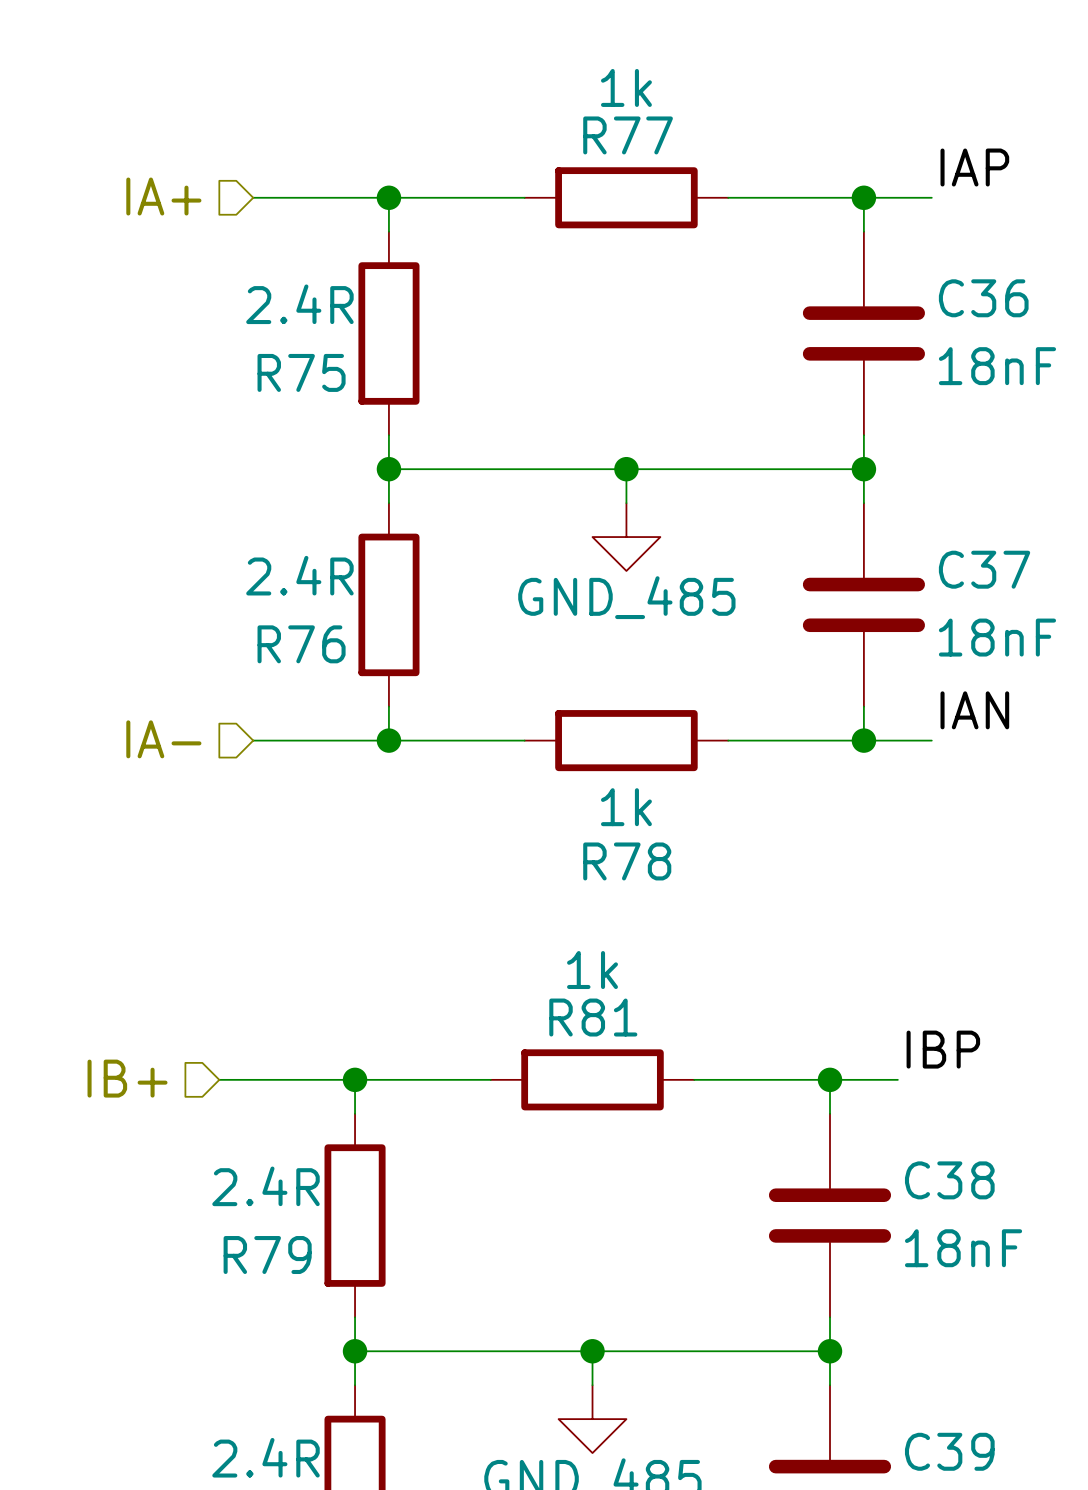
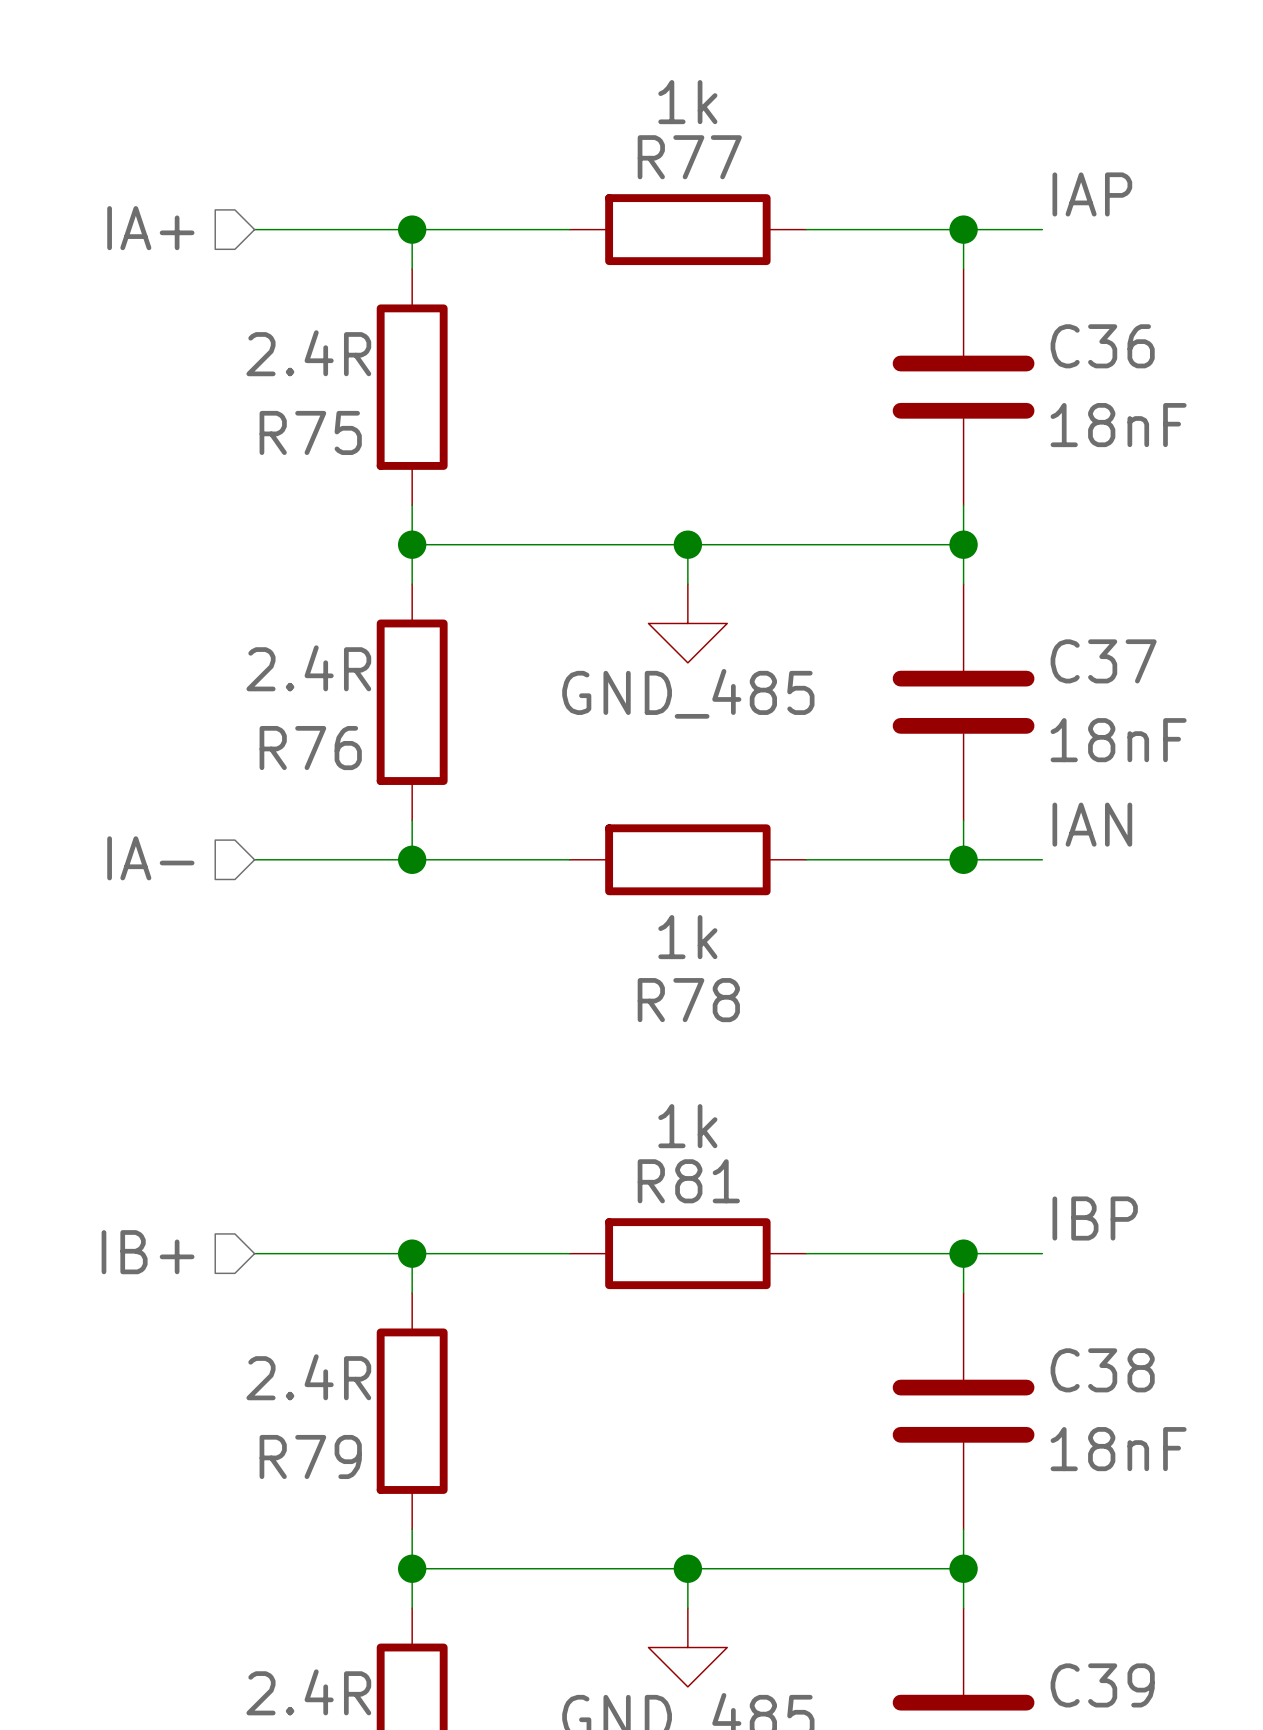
label position: IAP (974, 167) -> IAP (1092, 194)
hierarchical label position: IA+ (163, 196) -> IA+ (150, 228)
wire: none -> (254, 229) (294, 229)
wire: (388, 197) (388, 231) -> (412, 229) (412, 269)
junction position: (388, 197) -> (412, 229)
R77 position: (626, 197) -> (687, 229)
wire: (863, 197) (863, 231) -> (963, 229) (963, 269)
junction position: (863, 197) -> (963, 229)
wire: (897, 197) (931, 197) -> none
R75 position: (388, 333) -> (412, 387)
C36 position: (863, 333) -> (963, 387)
wire: (388, 435) (388, 503) -> (412, 505) (412, 584)
wire: (863, 435) (863, 503) -> (963, 505) (963, 584)
junction position: (388, 469) -> (412, 544)
wire: (626, 469) (626, 503) -> (687, 544) (687, 584)
junction position: (626, 469) -> (687, 544)
wire: (829, 469) (863, 469) -> (412, 544) (451, 544)
junction position: (863, 469) -> (963, 544)
power symbol position: GND_485 (626, 537) -> GND_485 (687, 623)
R76 position: (388, 604) -> (412, 702)
C37 position: (863, 604) -> (963, 702)
wire: (388, 706) (388, 740) -> (412, 820) (412, 859)
wire: (863, 706) (863, 740) -> (963, 820) (963, 859)
label position: IAN (974, 710) -> IAN (1092, 824)
hierarchical label position: IA- (163, 739) -> IA- (150, 858)
wire: none -> (254, 859) (294, 859)
junction position: (388, 740) -> (412, 859)
R78 position: (626, 740) -> (687, 859)
junction position: (863, 740) -> (963, 859)
wire: (897, 740) (931, 740) -> none

